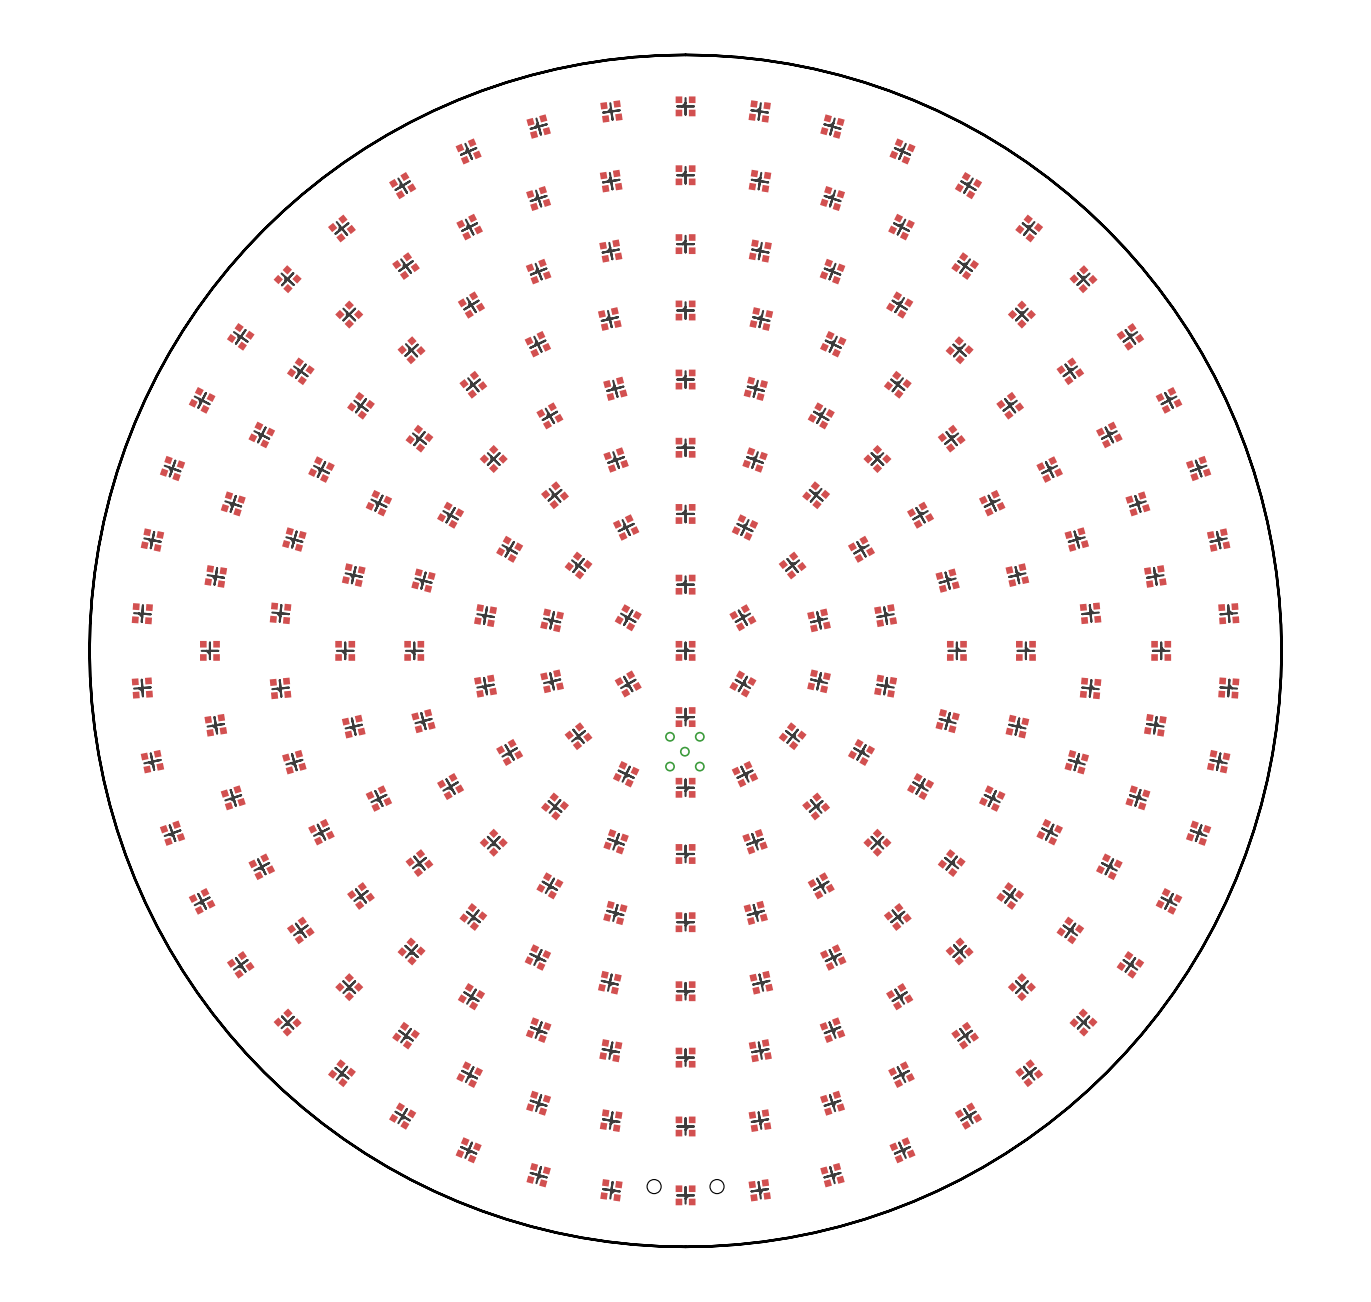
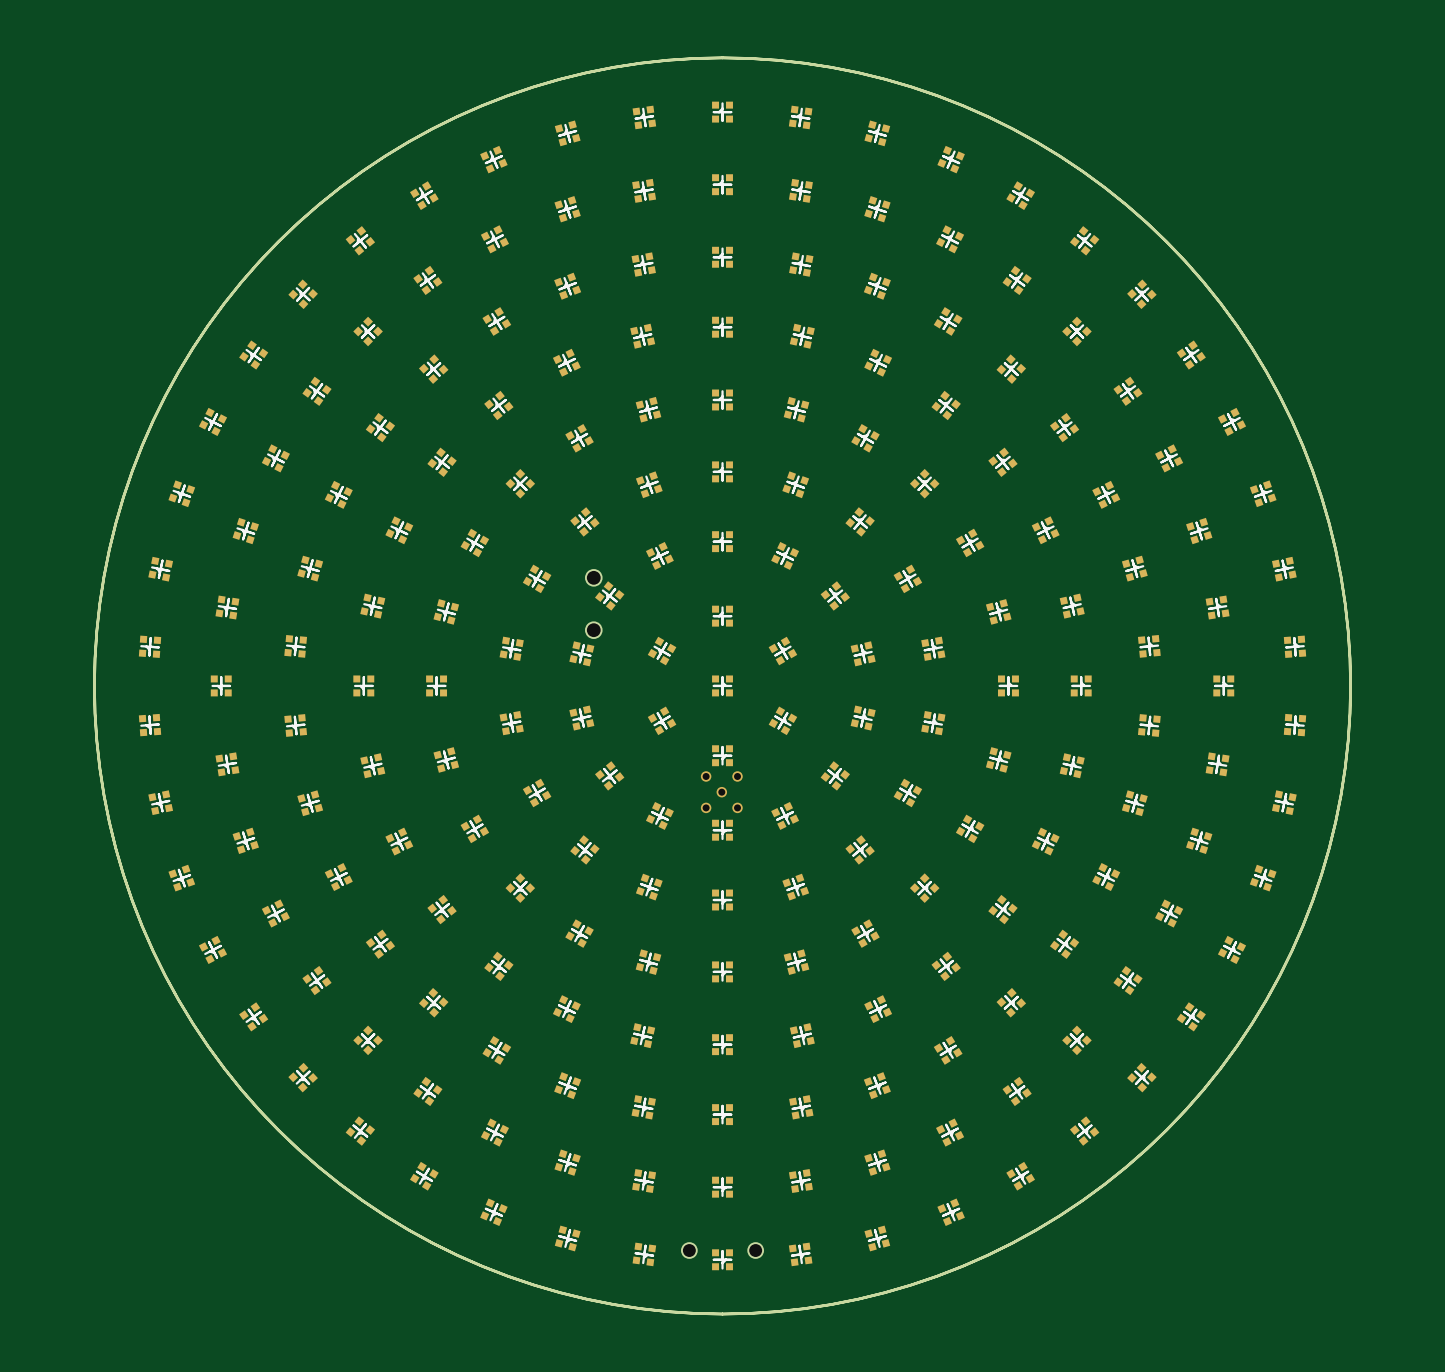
part: none -> (593, 604)

